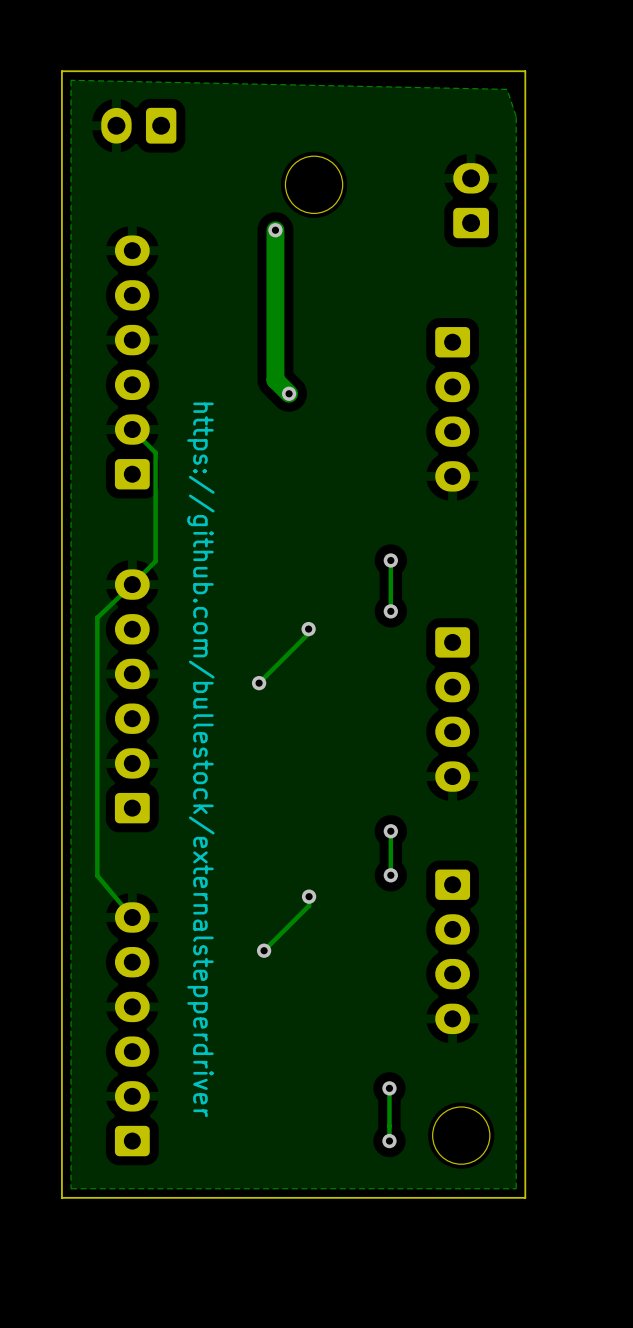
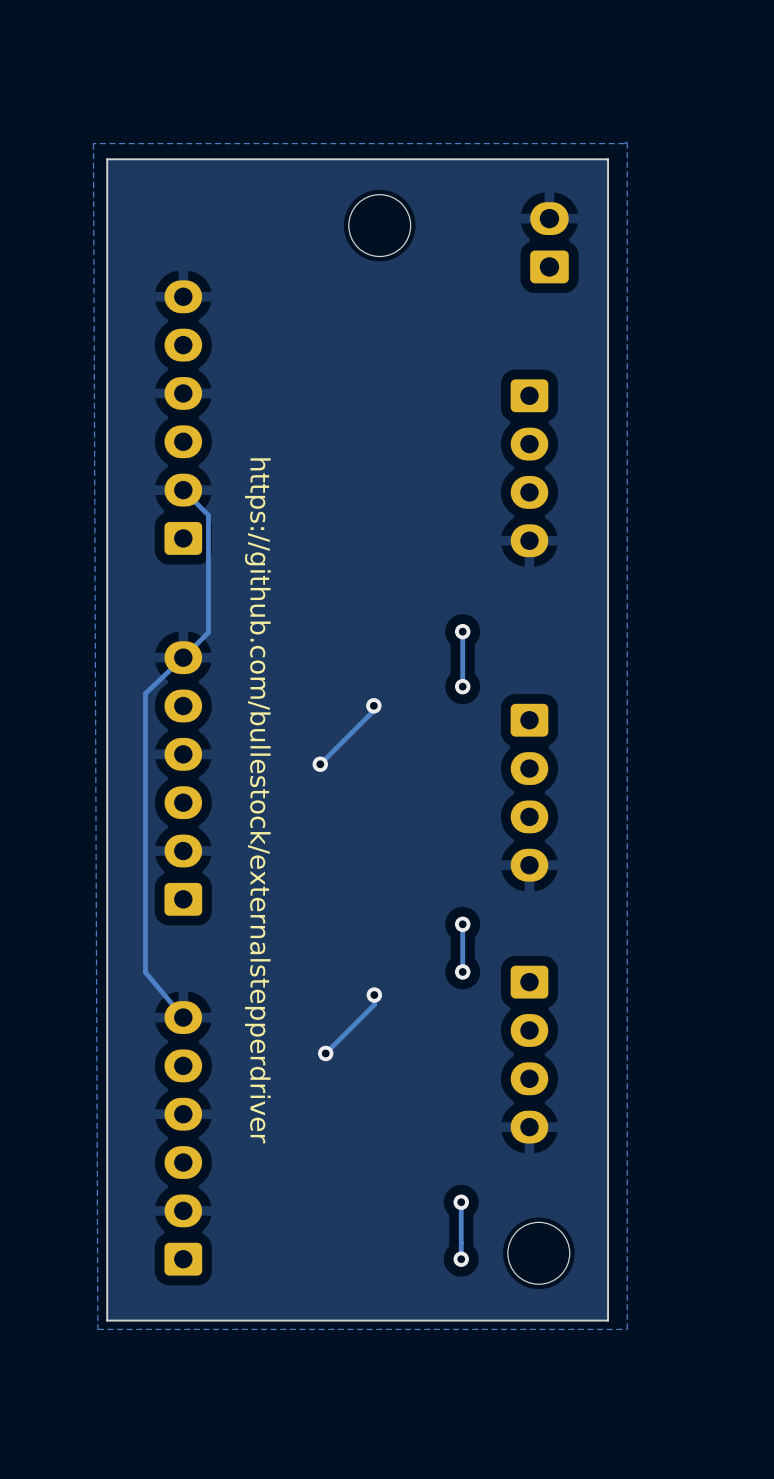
zone outline: (71, 80) (507, 89) (516, 116) (516, 1188) (71, 1188) (71, 80) -> (627, 142) (627, 1329) (97, 1329) (93, 143) (627, 142)
board edge: (525, 123) (525, 71) (61, 71) (61, 123) -> (608, 159) (107, 159)
part: (138, 125) -> none
track: (275, 230) (275, 380) (289, 393) -> none
via: (275, 230) -> none
via: (289, 393) -> none

